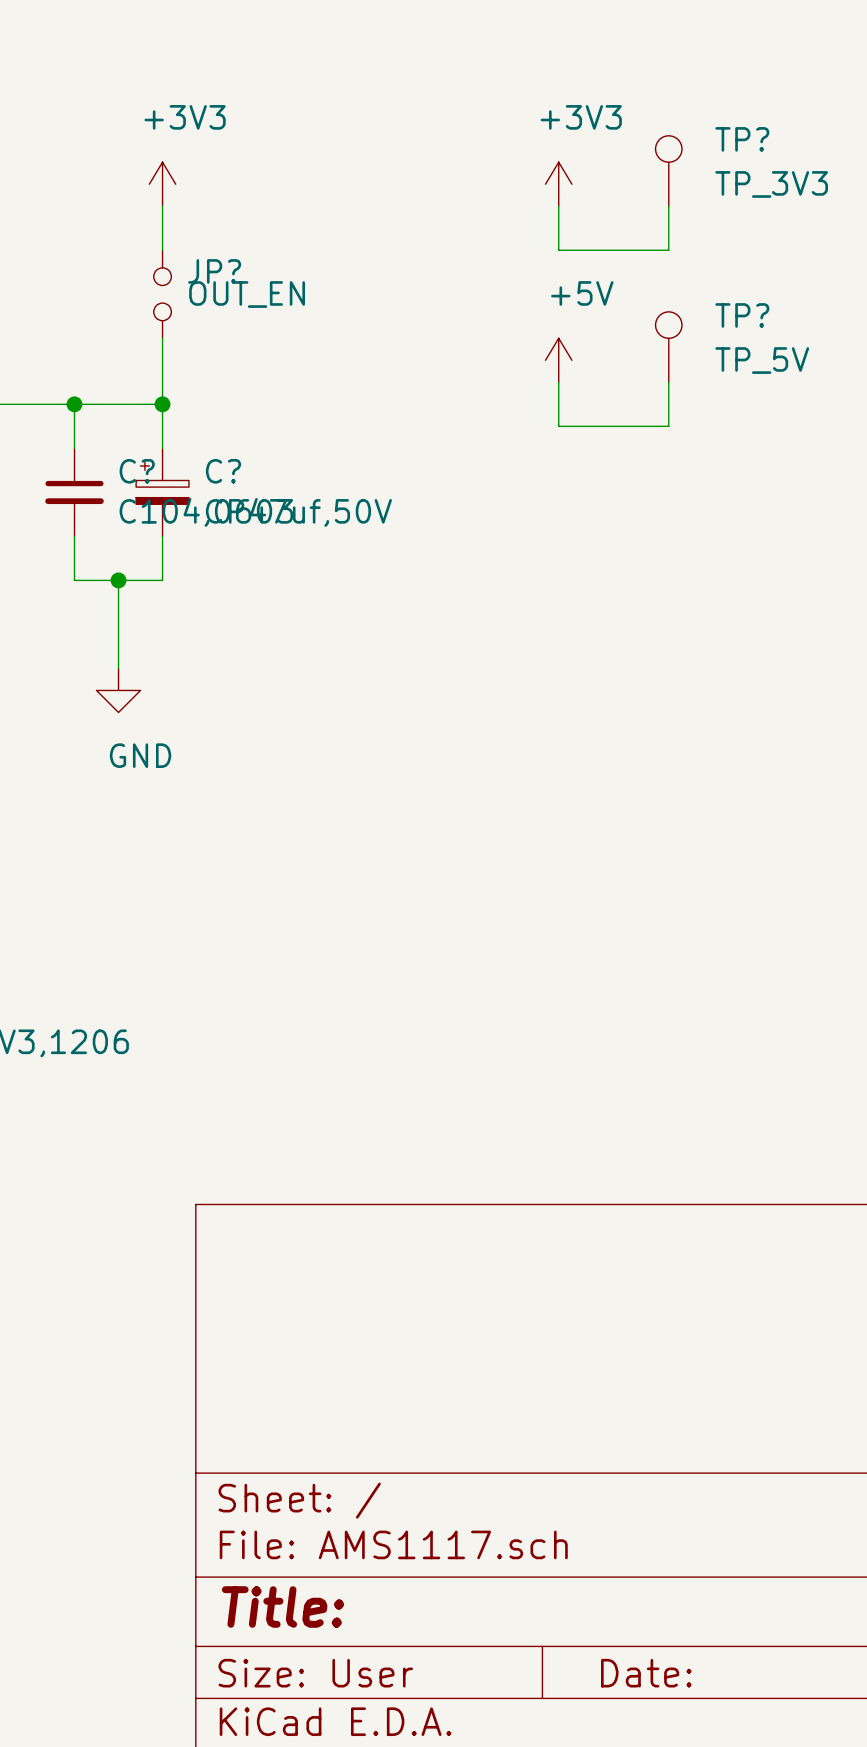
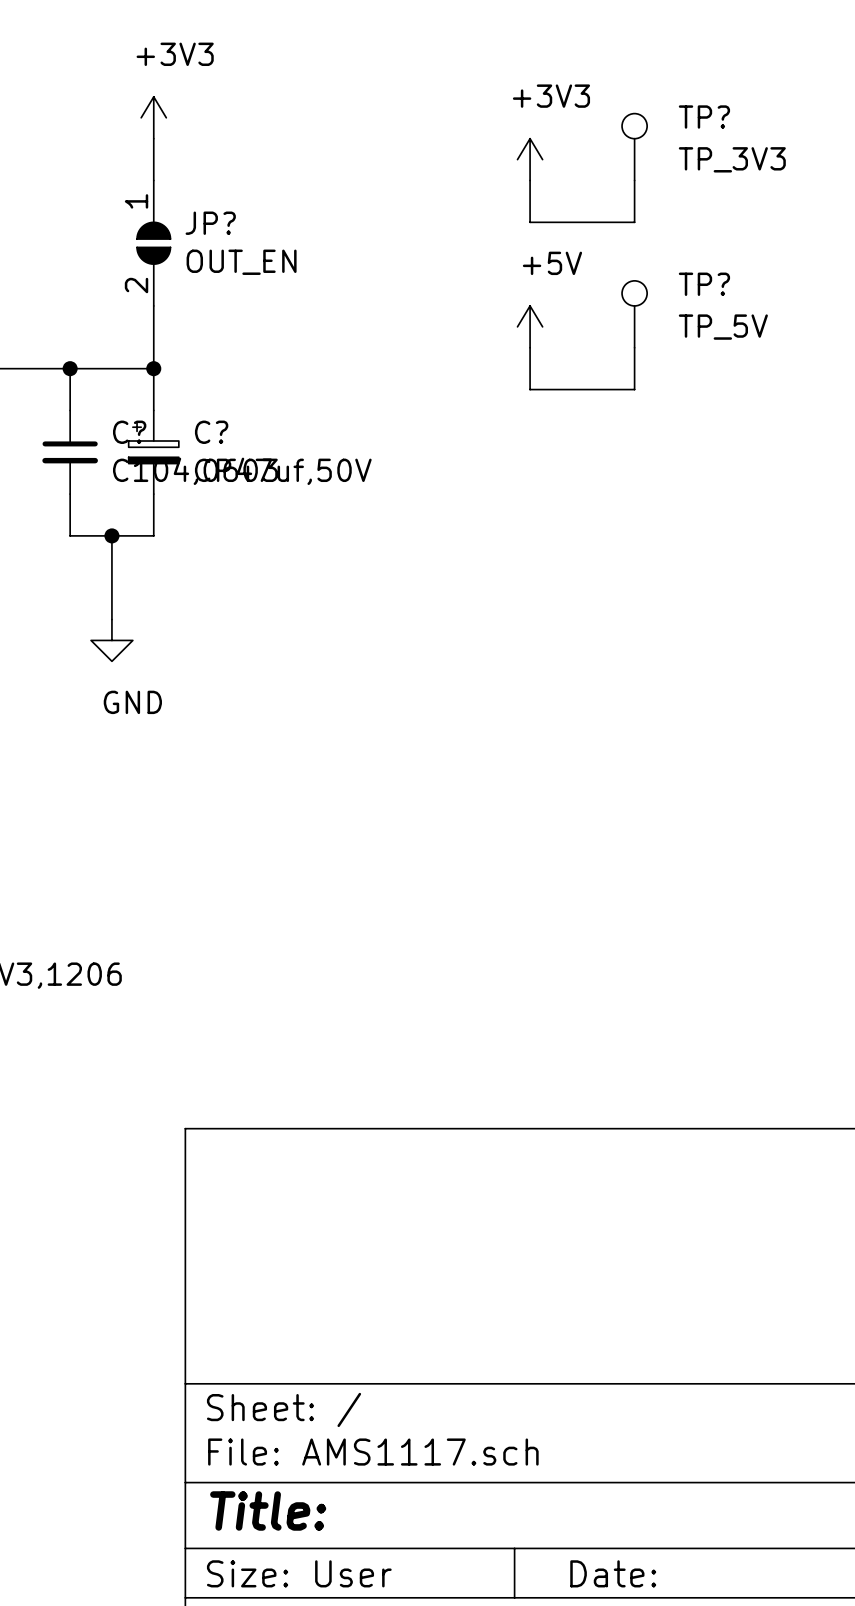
power symbol position: +3V3 (162, 184) -> +3V3 (153, 117)
JP?: none -> OUT_EN (153, 243)
JP?: OUT_EN (162, 294) -> none

